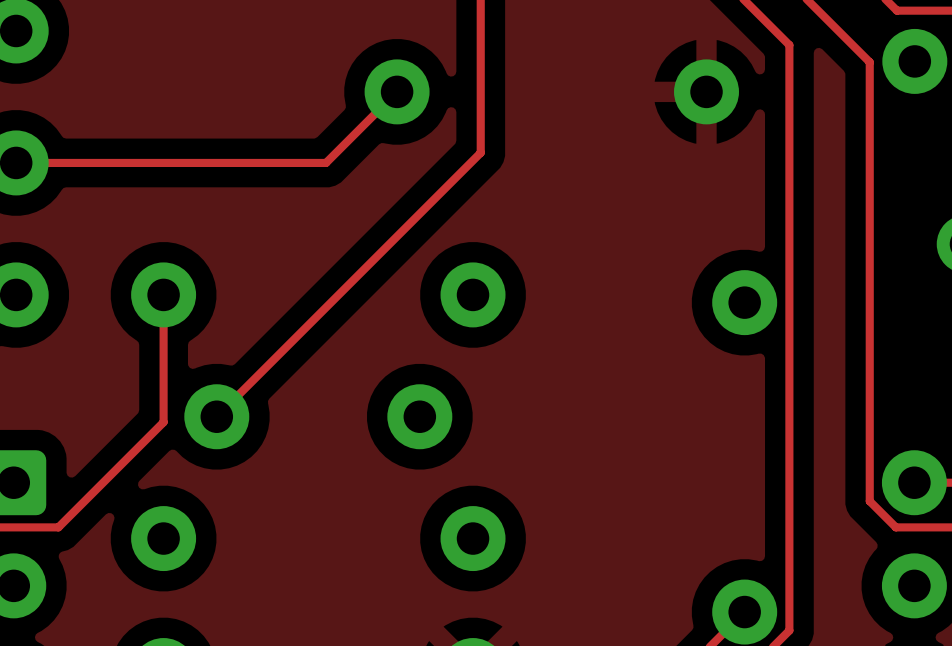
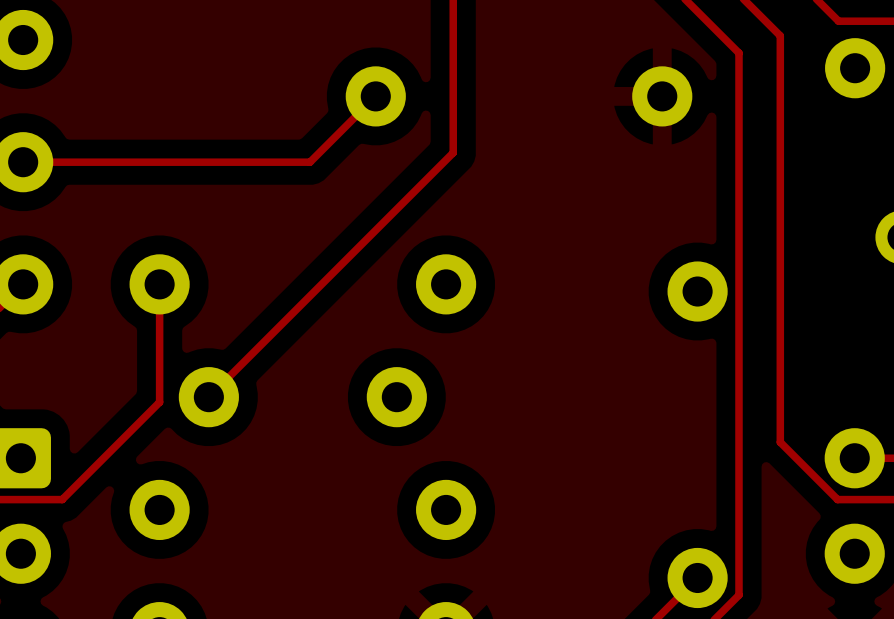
track: (834, 26) (869, 62) (869, 501) -> (780, 35) (780, 442) (813, 475)

